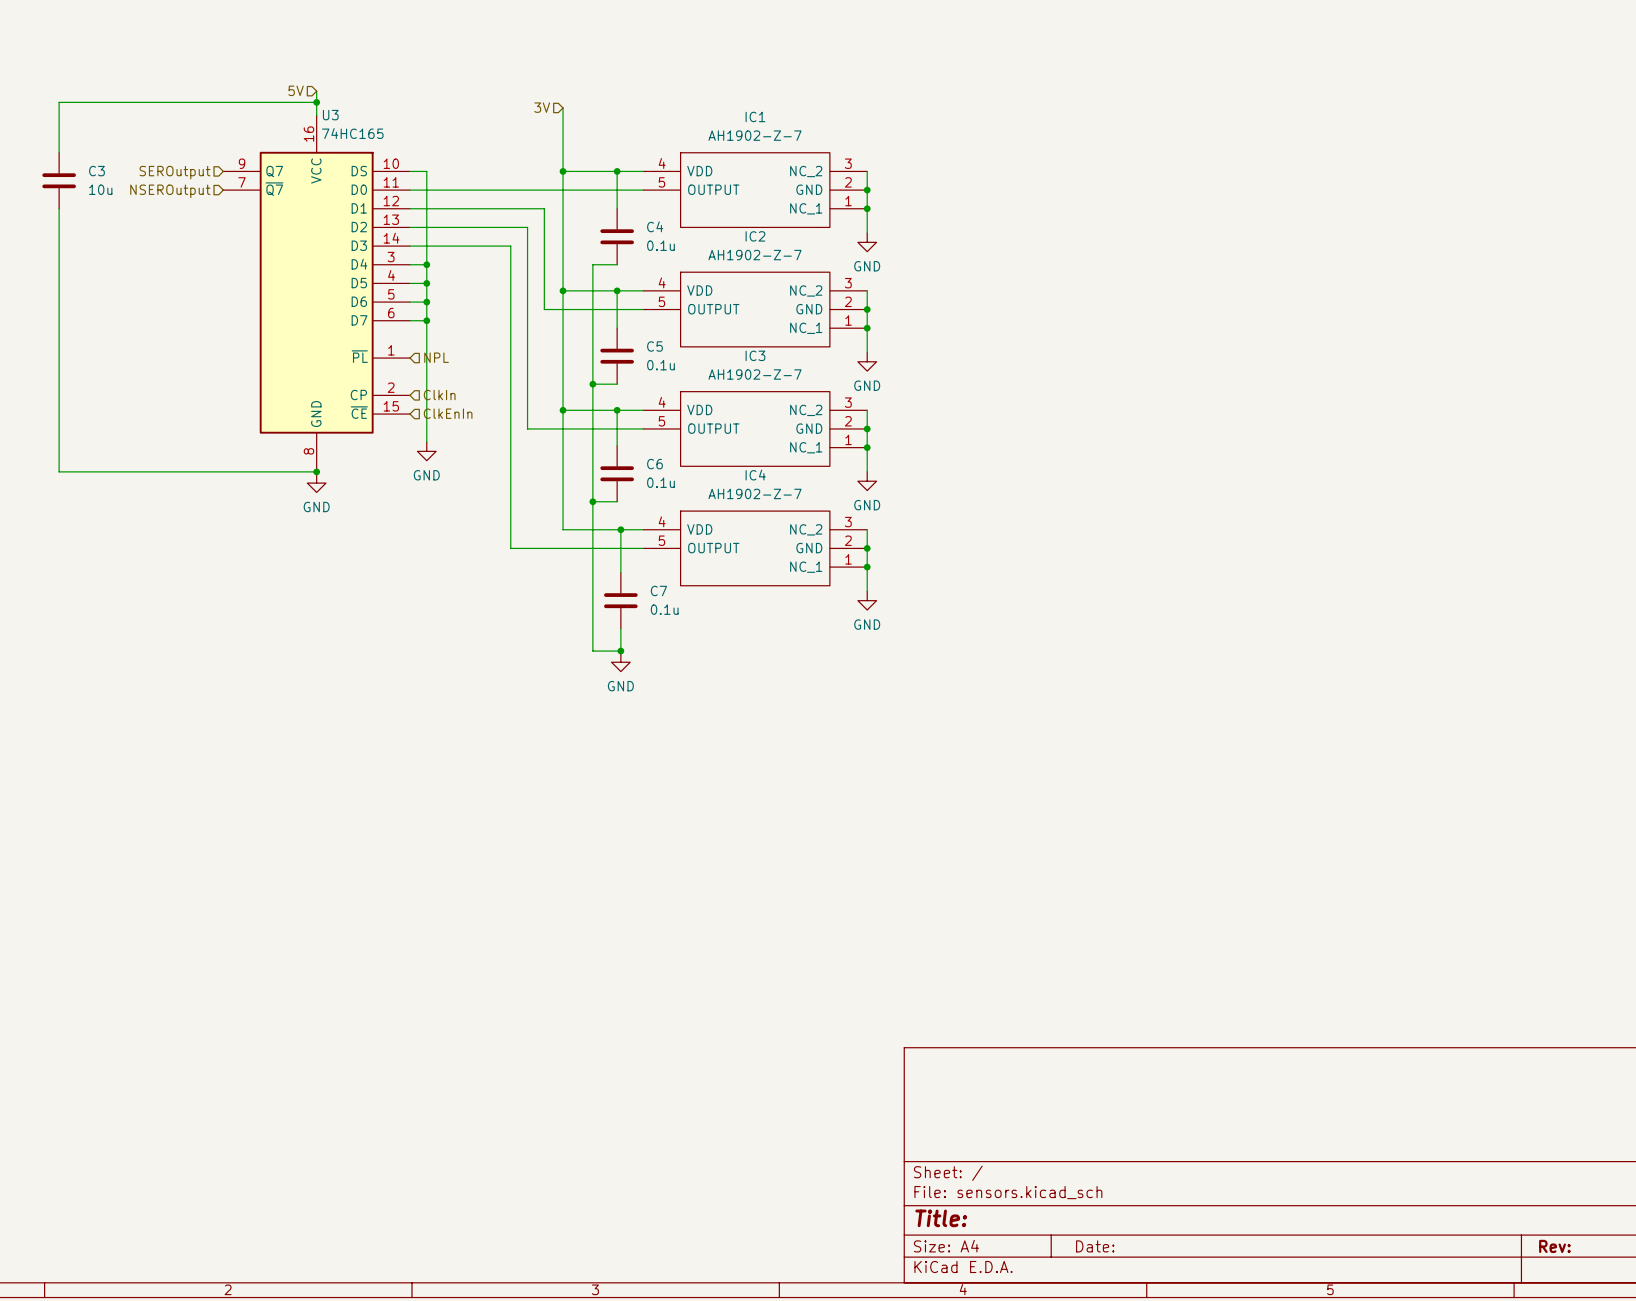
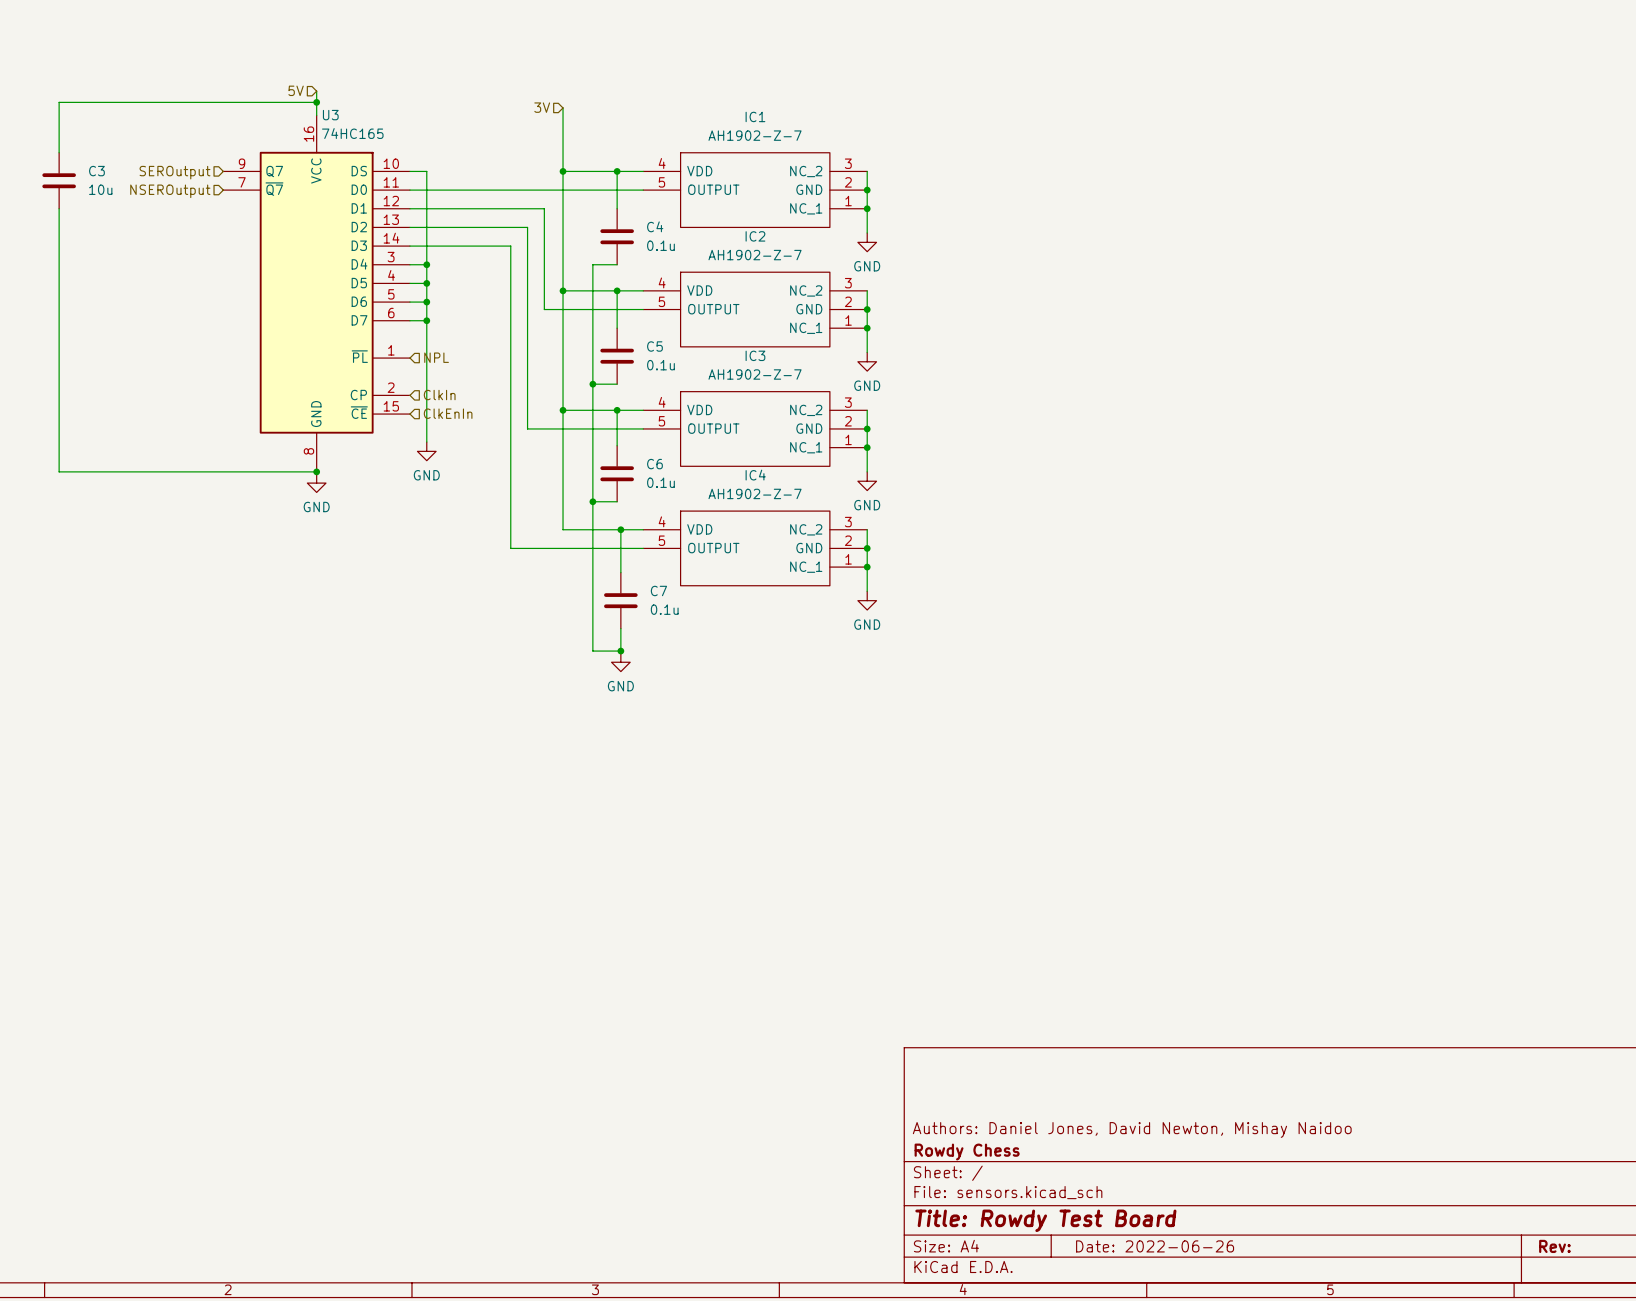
title block: none -> Authors: Daniel Jones, David Newton, Mishay Naidoo (1132, 1129)
title block: none -> Rowdy Chess (967, 1152)
title block: Title: (941, 1218) -> Title: Rowdy Test Board (1045, 1220)
title block: Date: (1095, 1246) -> Date: 2022-06-26 (1155, 1246)

